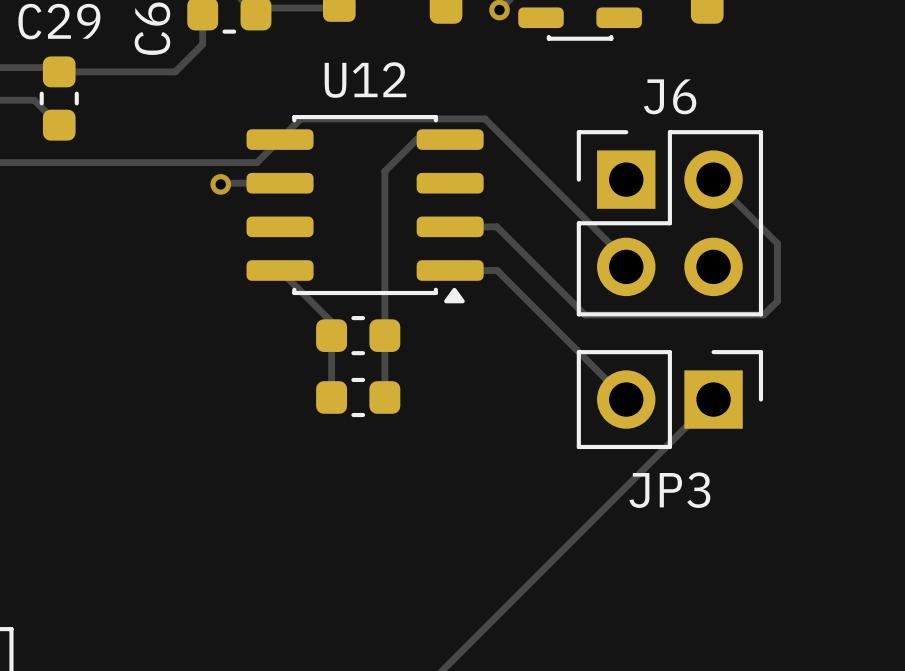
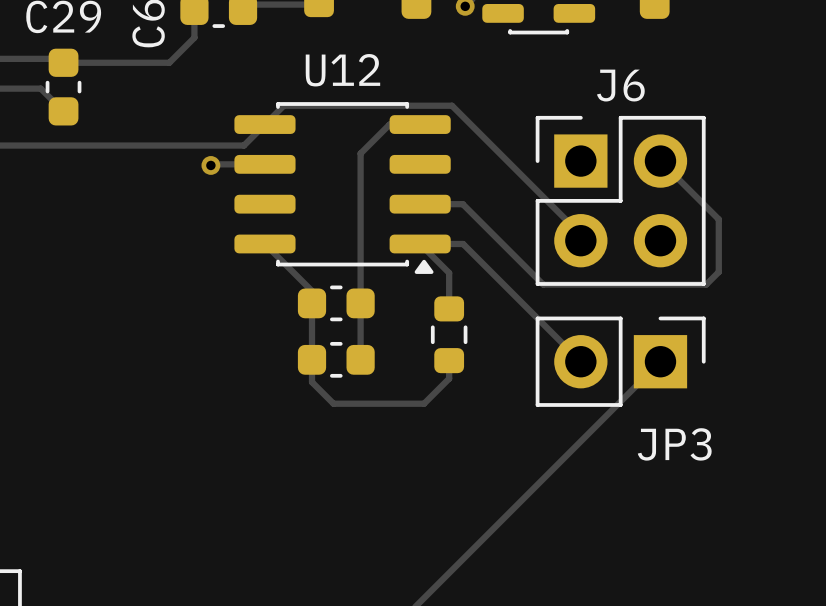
track: none -> (420, 243) (449, 272) (449, 308)
part: none -> (449, 334)
track: none -> (312, 359) (312, 382) (333, 403) (424, 403) (449, 378) (449, 360)
JP3 name position: JP3 (669, 490) -> JP3 (674, 444)

